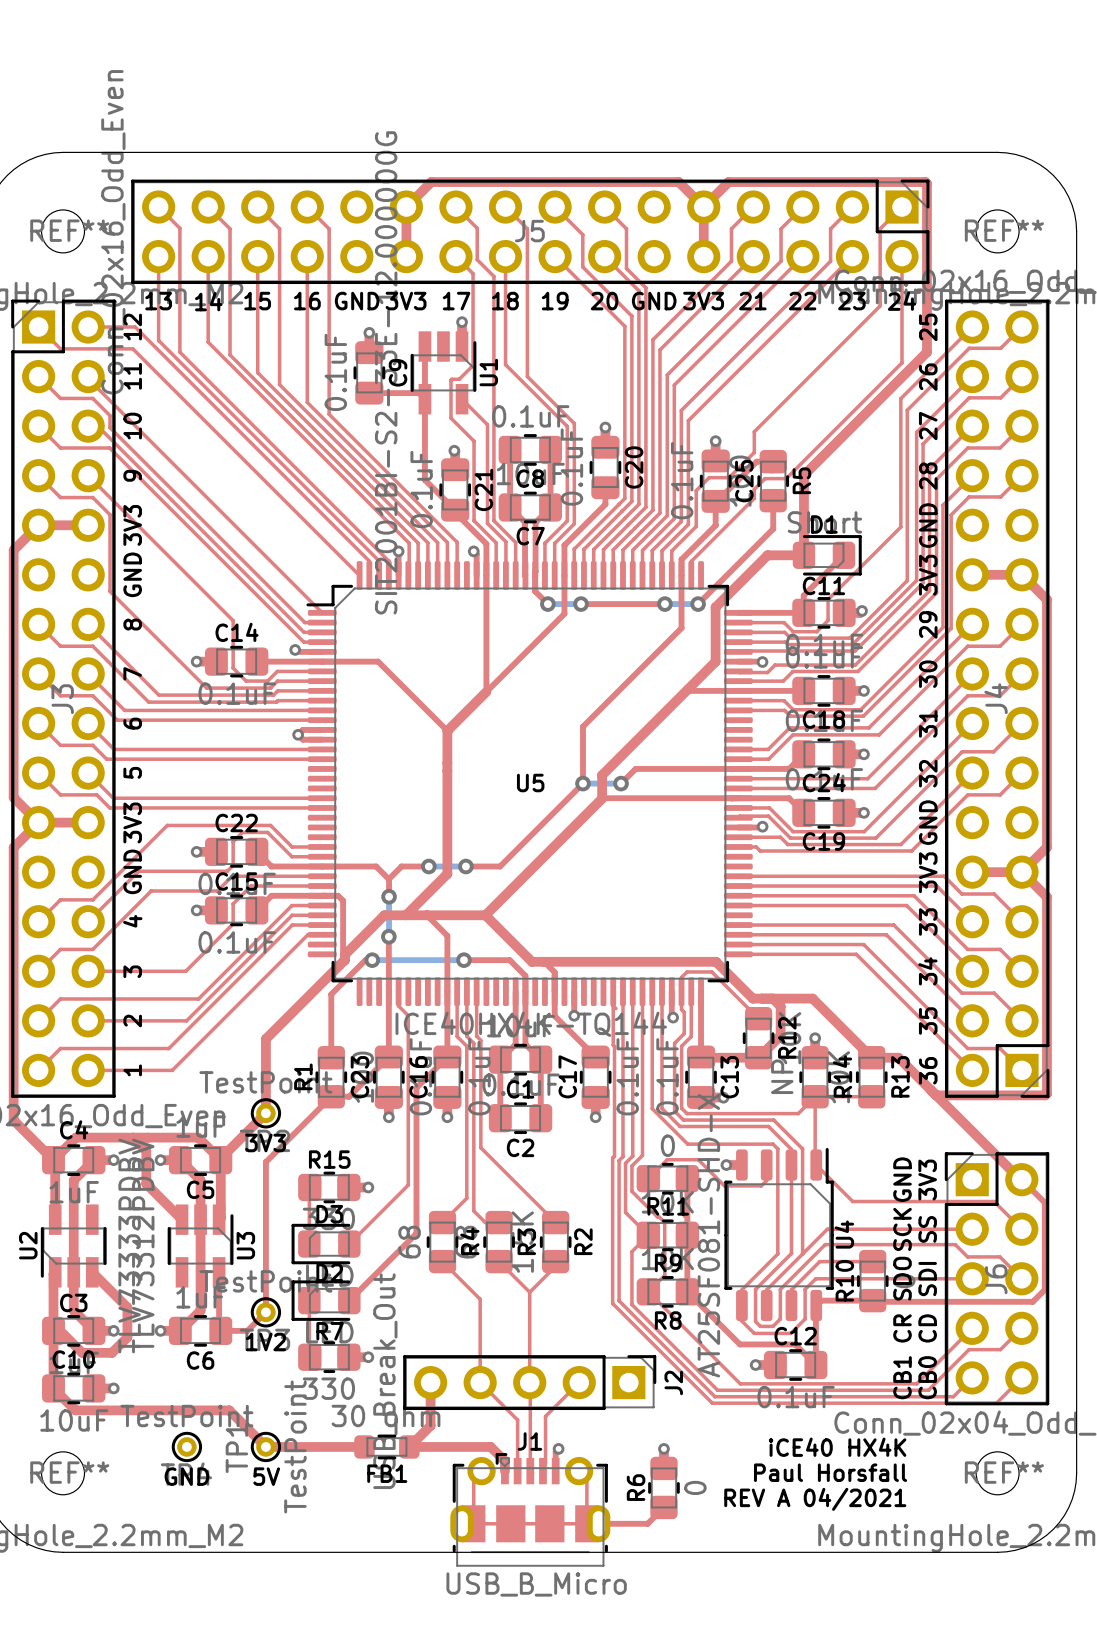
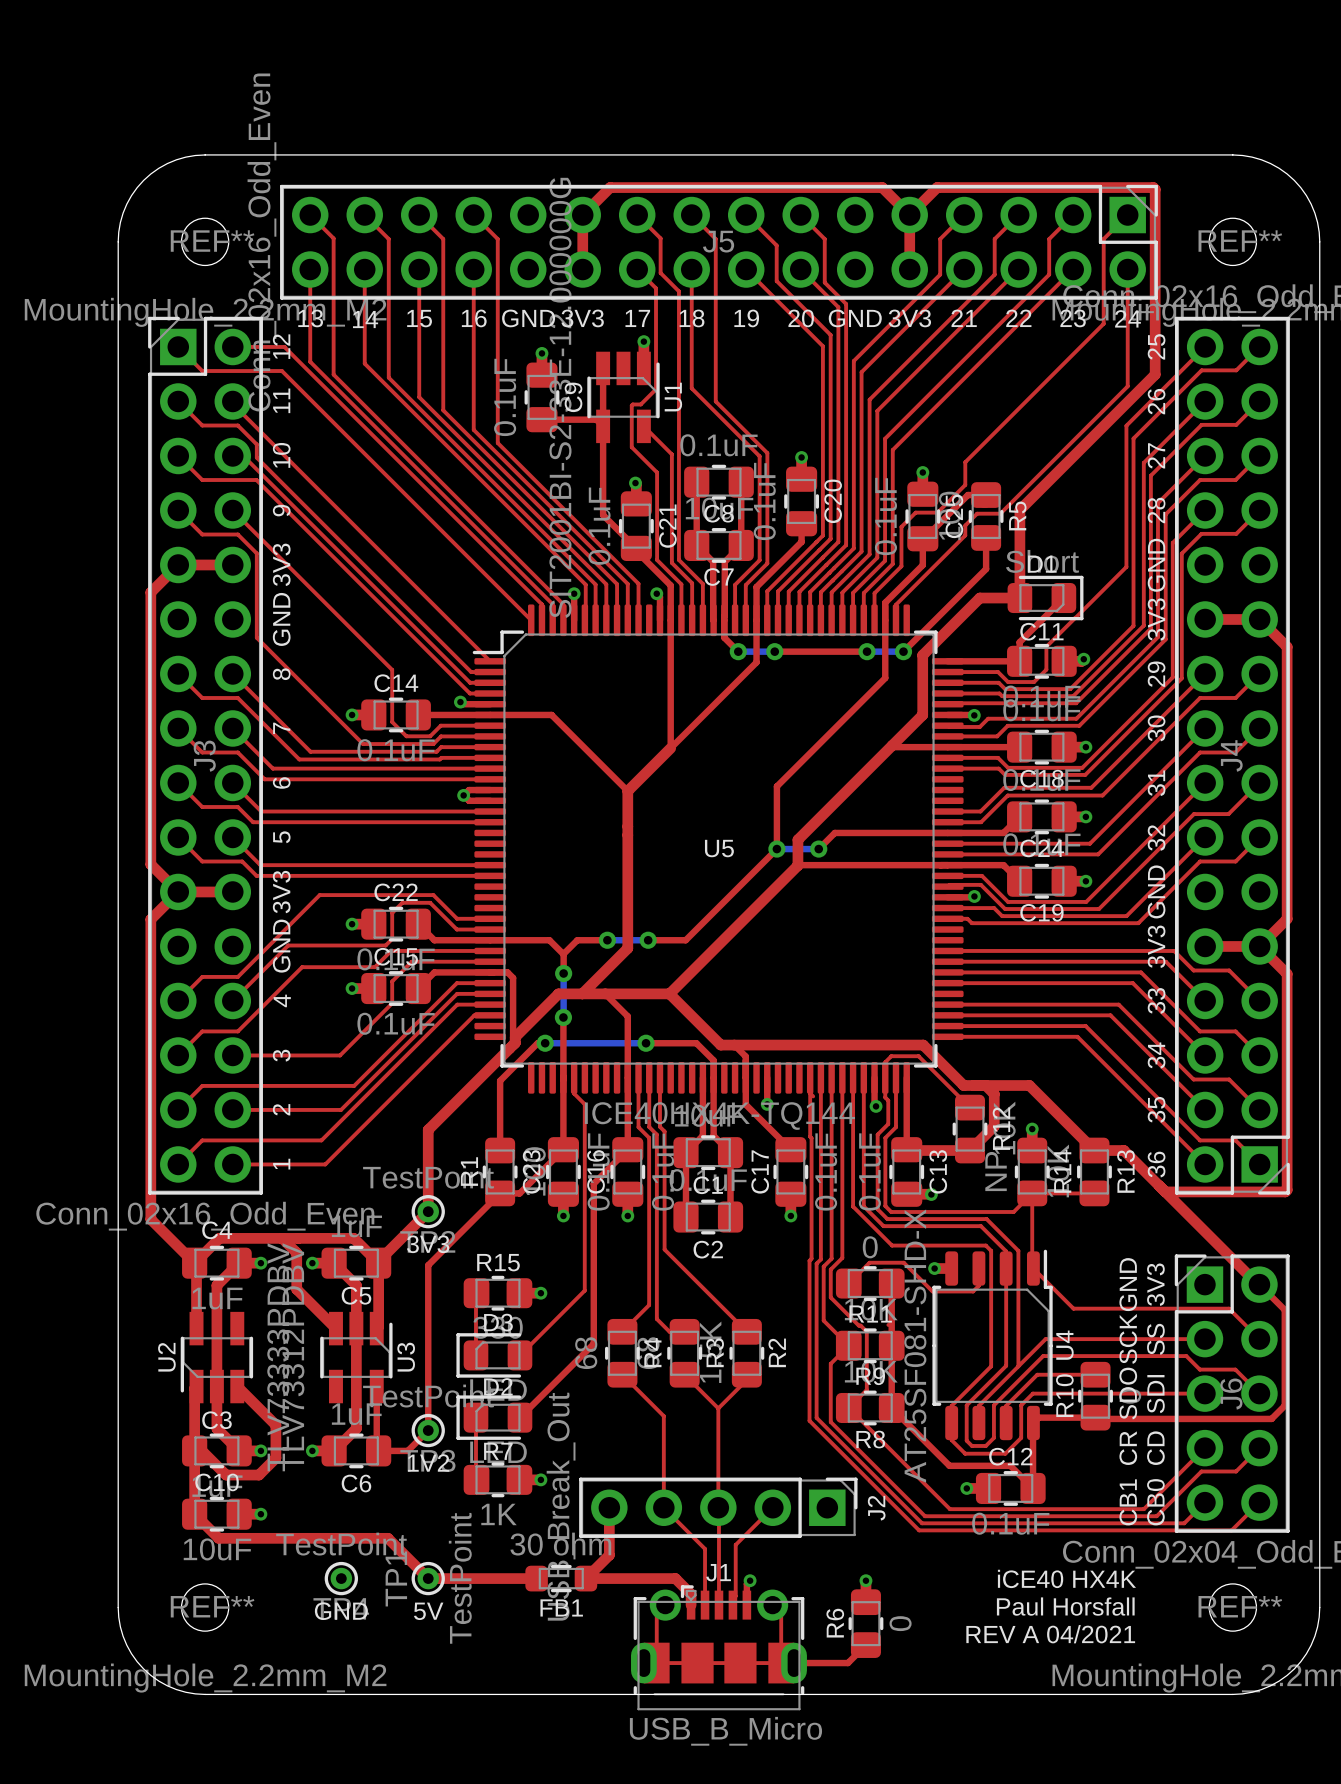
R7 value: 330 (328, 1388) -> 1K (498, 1514)

